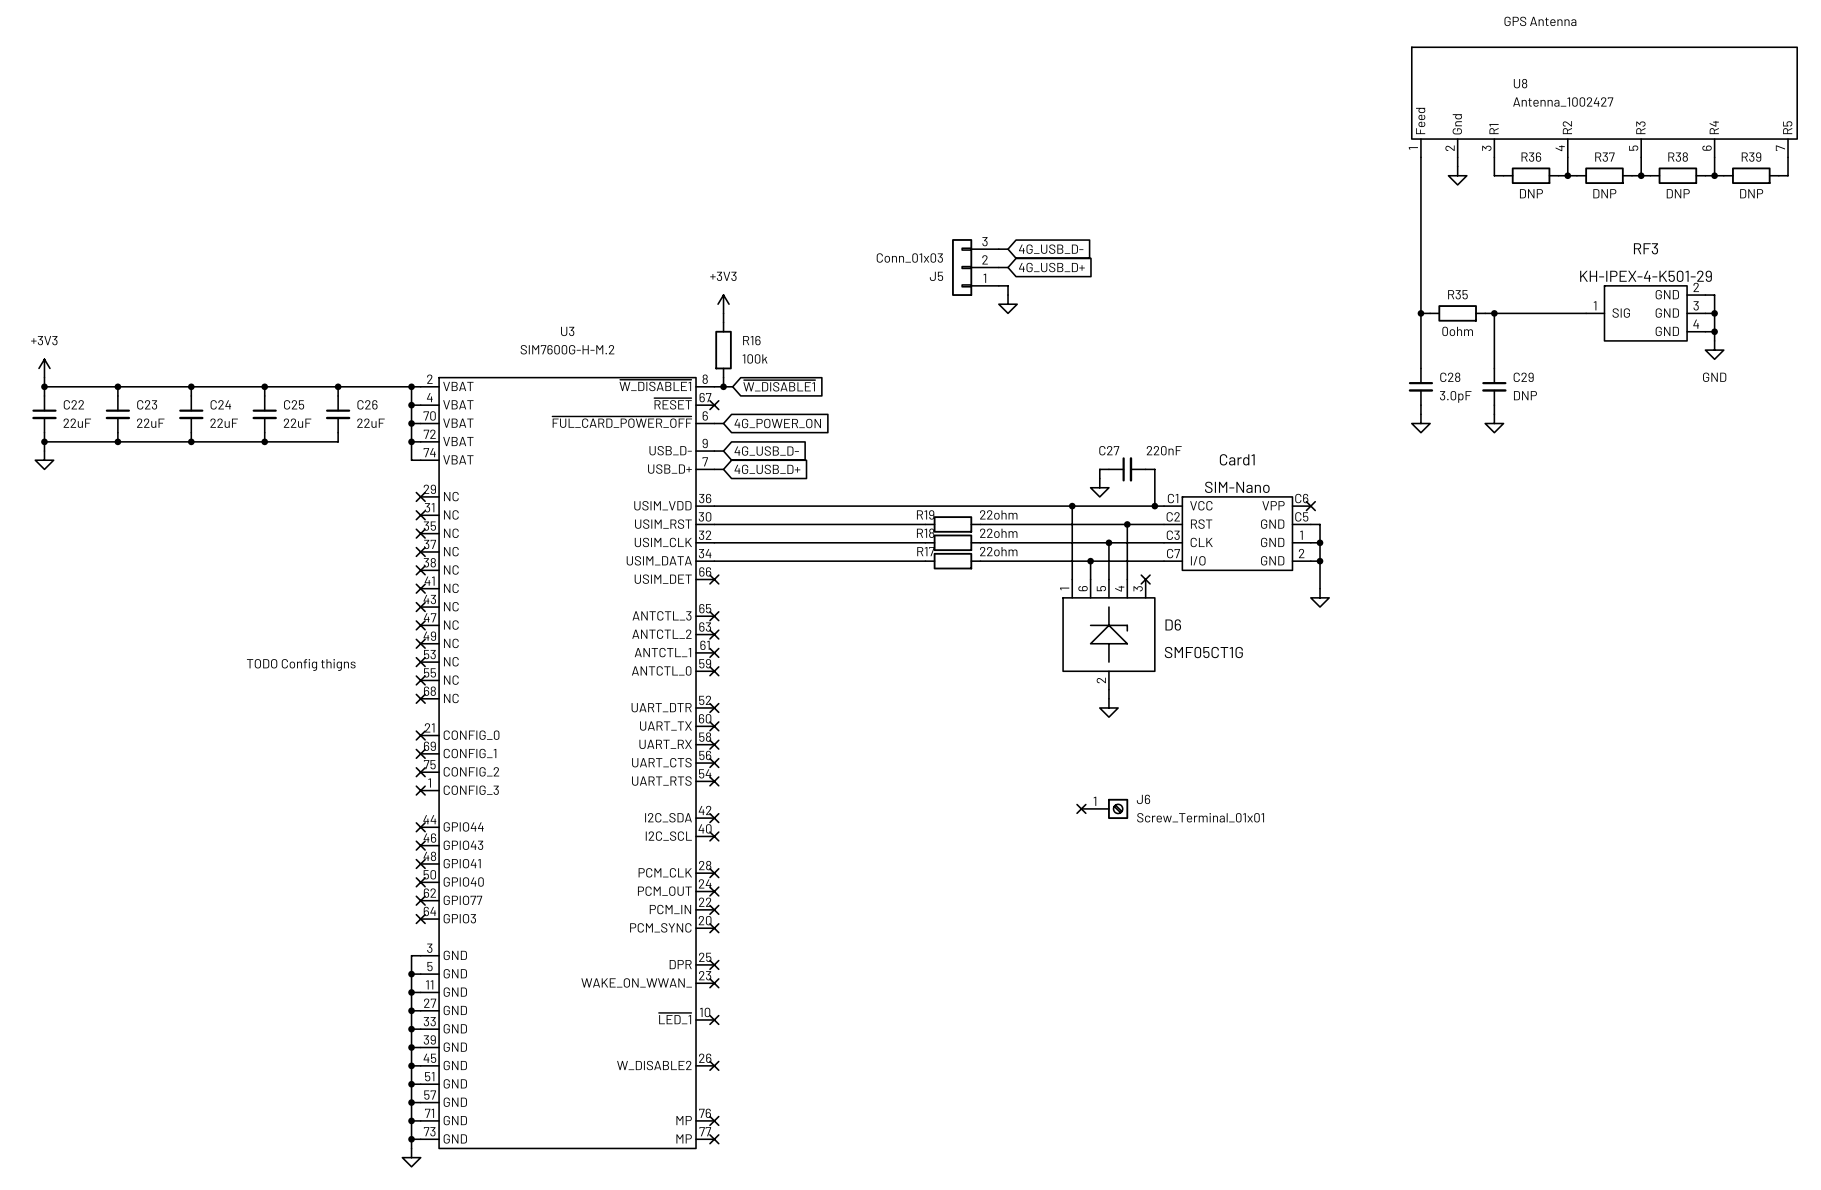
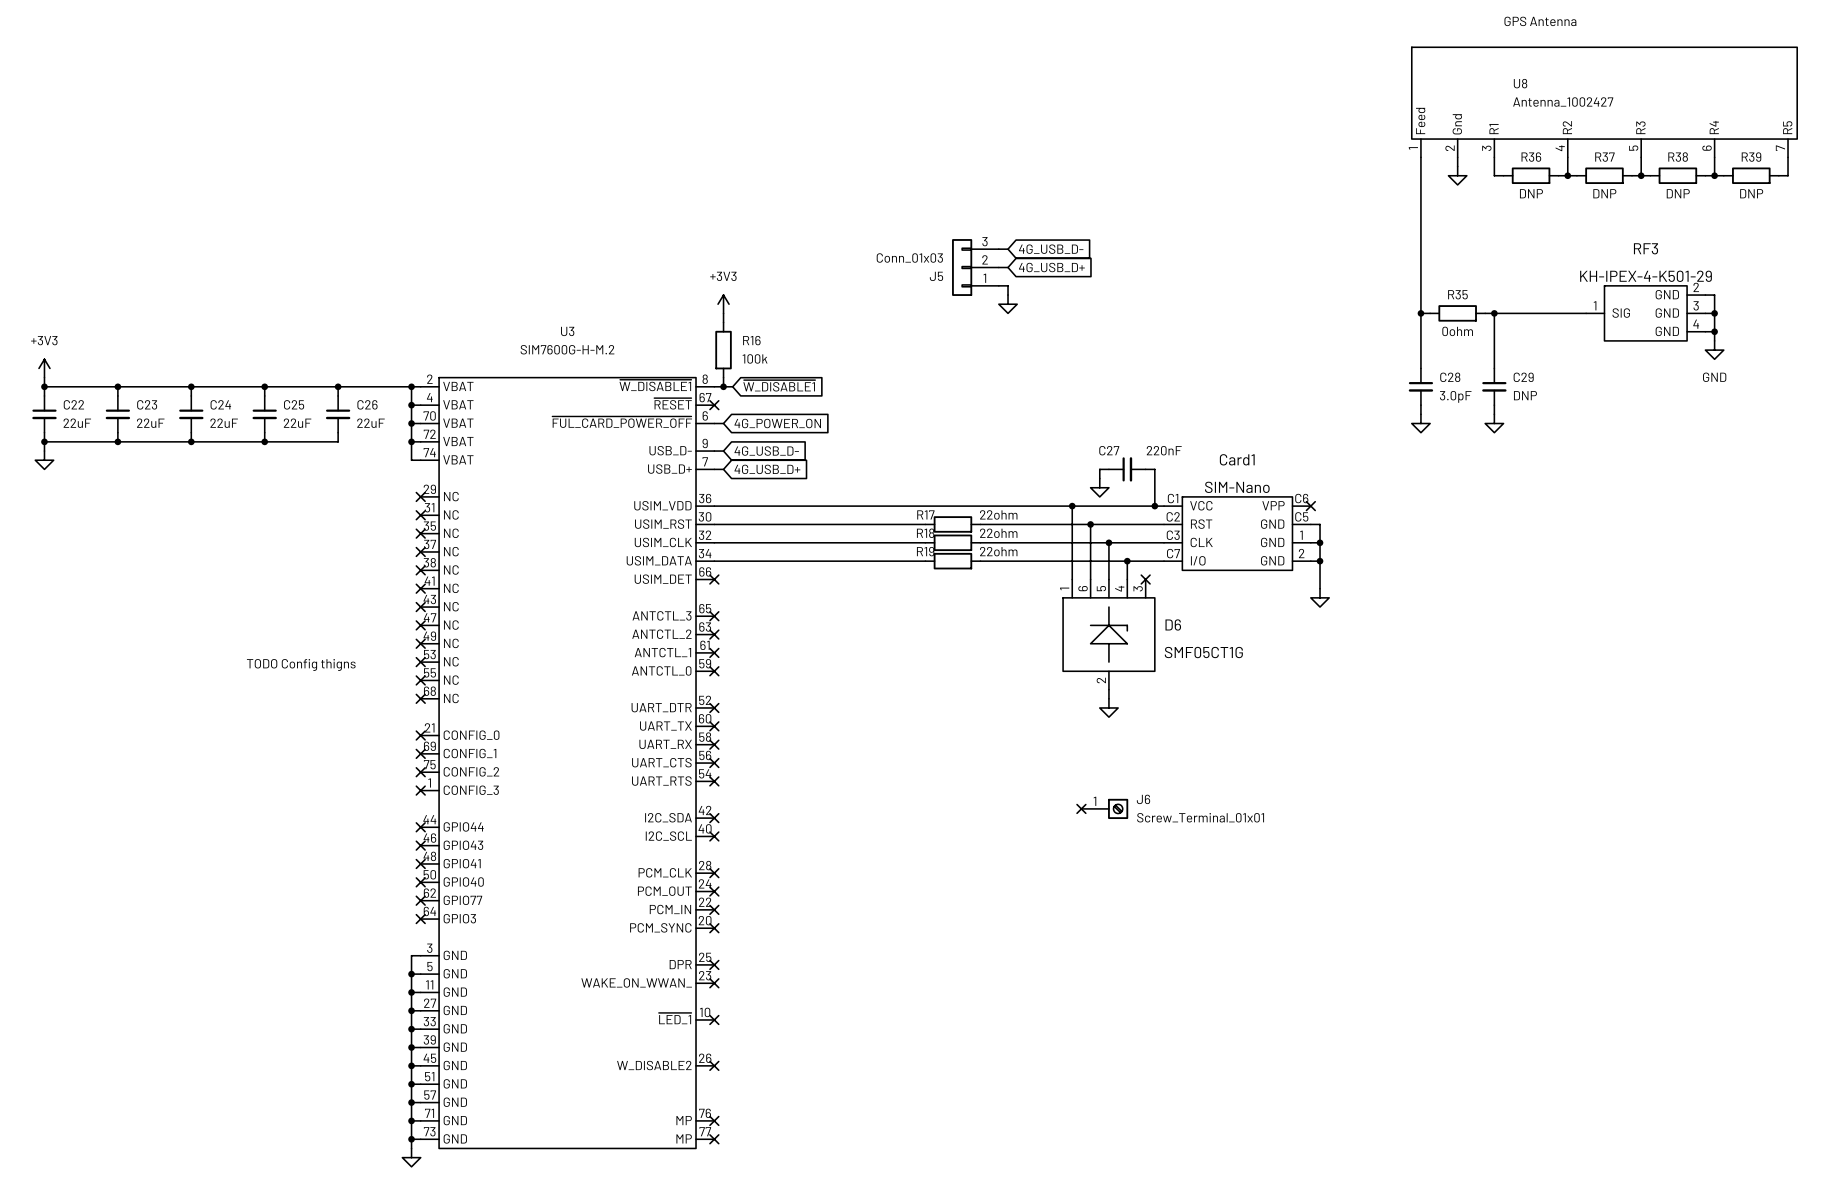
R19 name: R19 (925, 514) -> R17 (925, 514)
junction: none -> (1090, 524)
wire: (1127, 524) (1127, 561) -> (1090, 524) (1090, 561)
junction: (1127, 524) -> none
R17 name: R17 (925, 551) -> R19 (925, 551)
junction: (1090, 561) -> none
junction: none -> (1127, 561)

